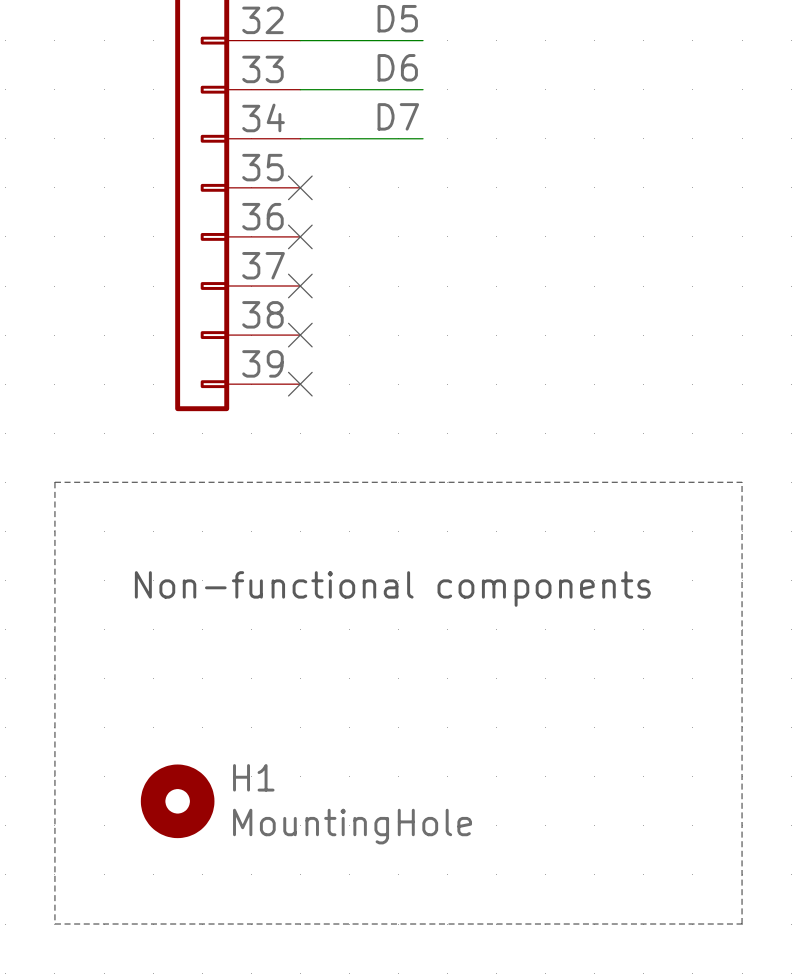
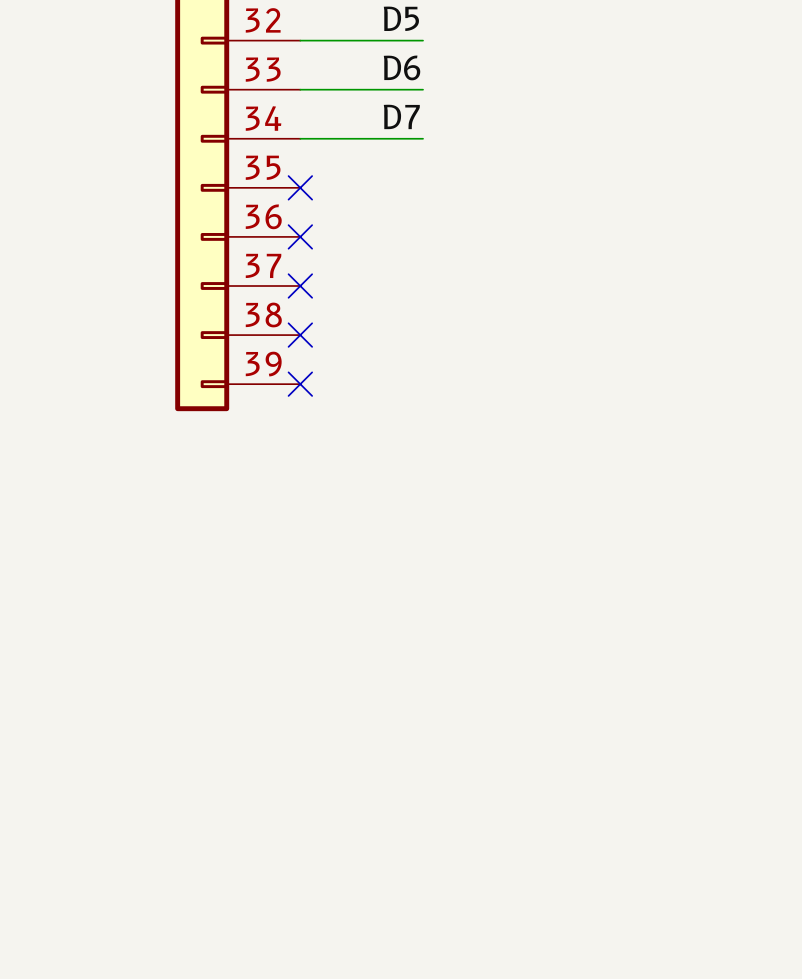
line: (54, 482) (54, 924) (742, 924) (742, 482) (54, 482) -> none
text: Non-functional components (392, 588) -> none
H1: MountingHole (177, 801) -> none

